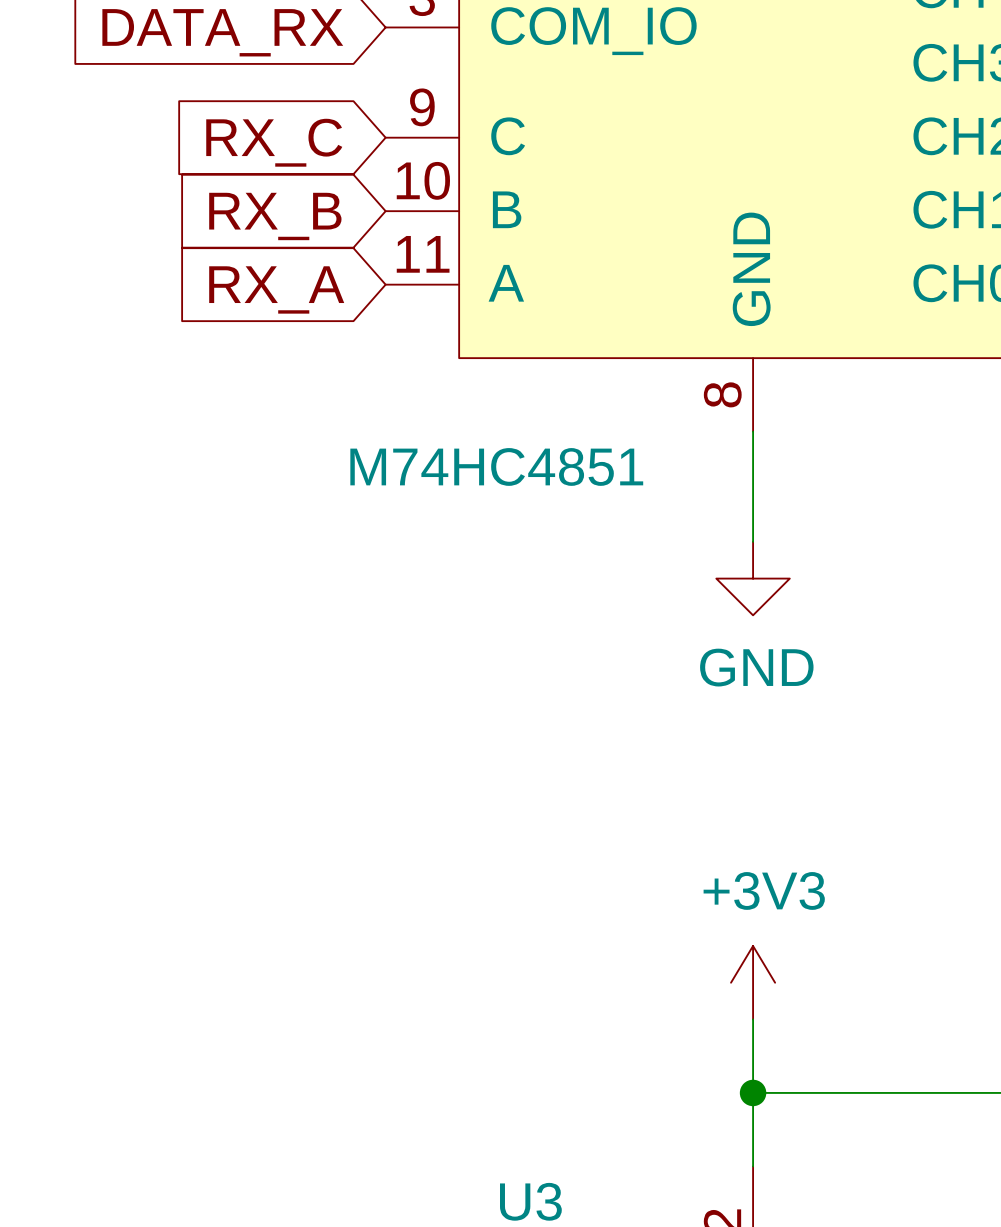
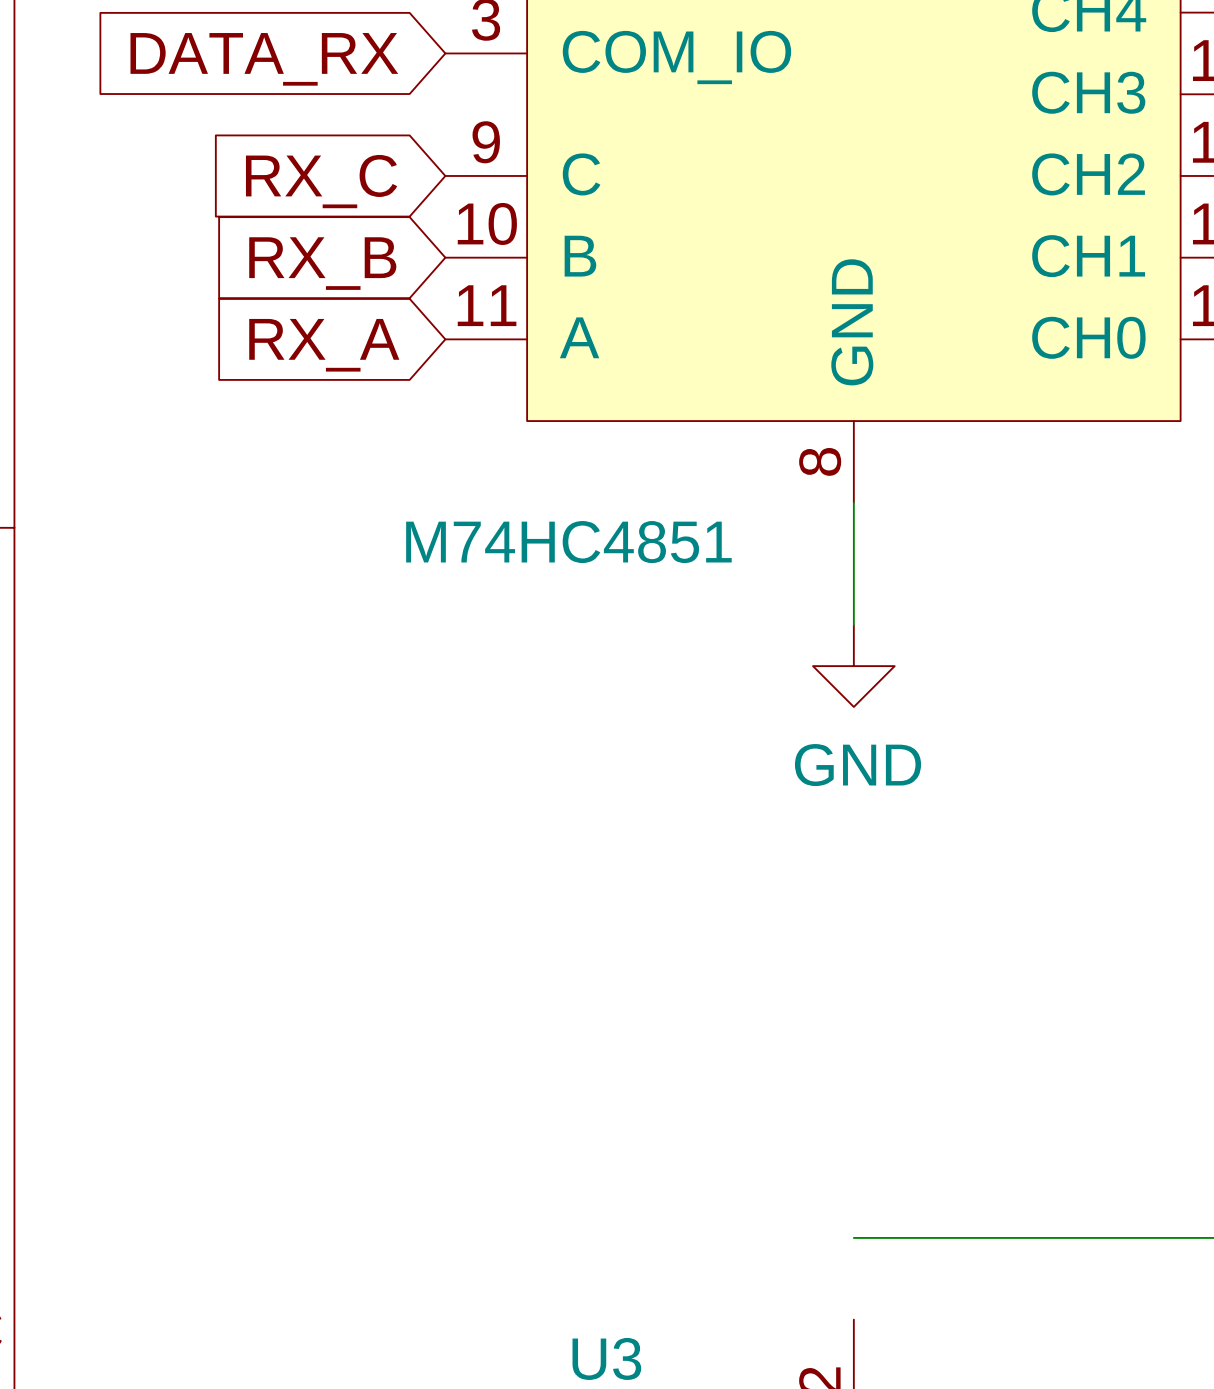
power symbol: +3V3 (753, 982) -> none
wire: (753, 1019) (753, 1166) -> none
junction: (753, 1092) -> none

